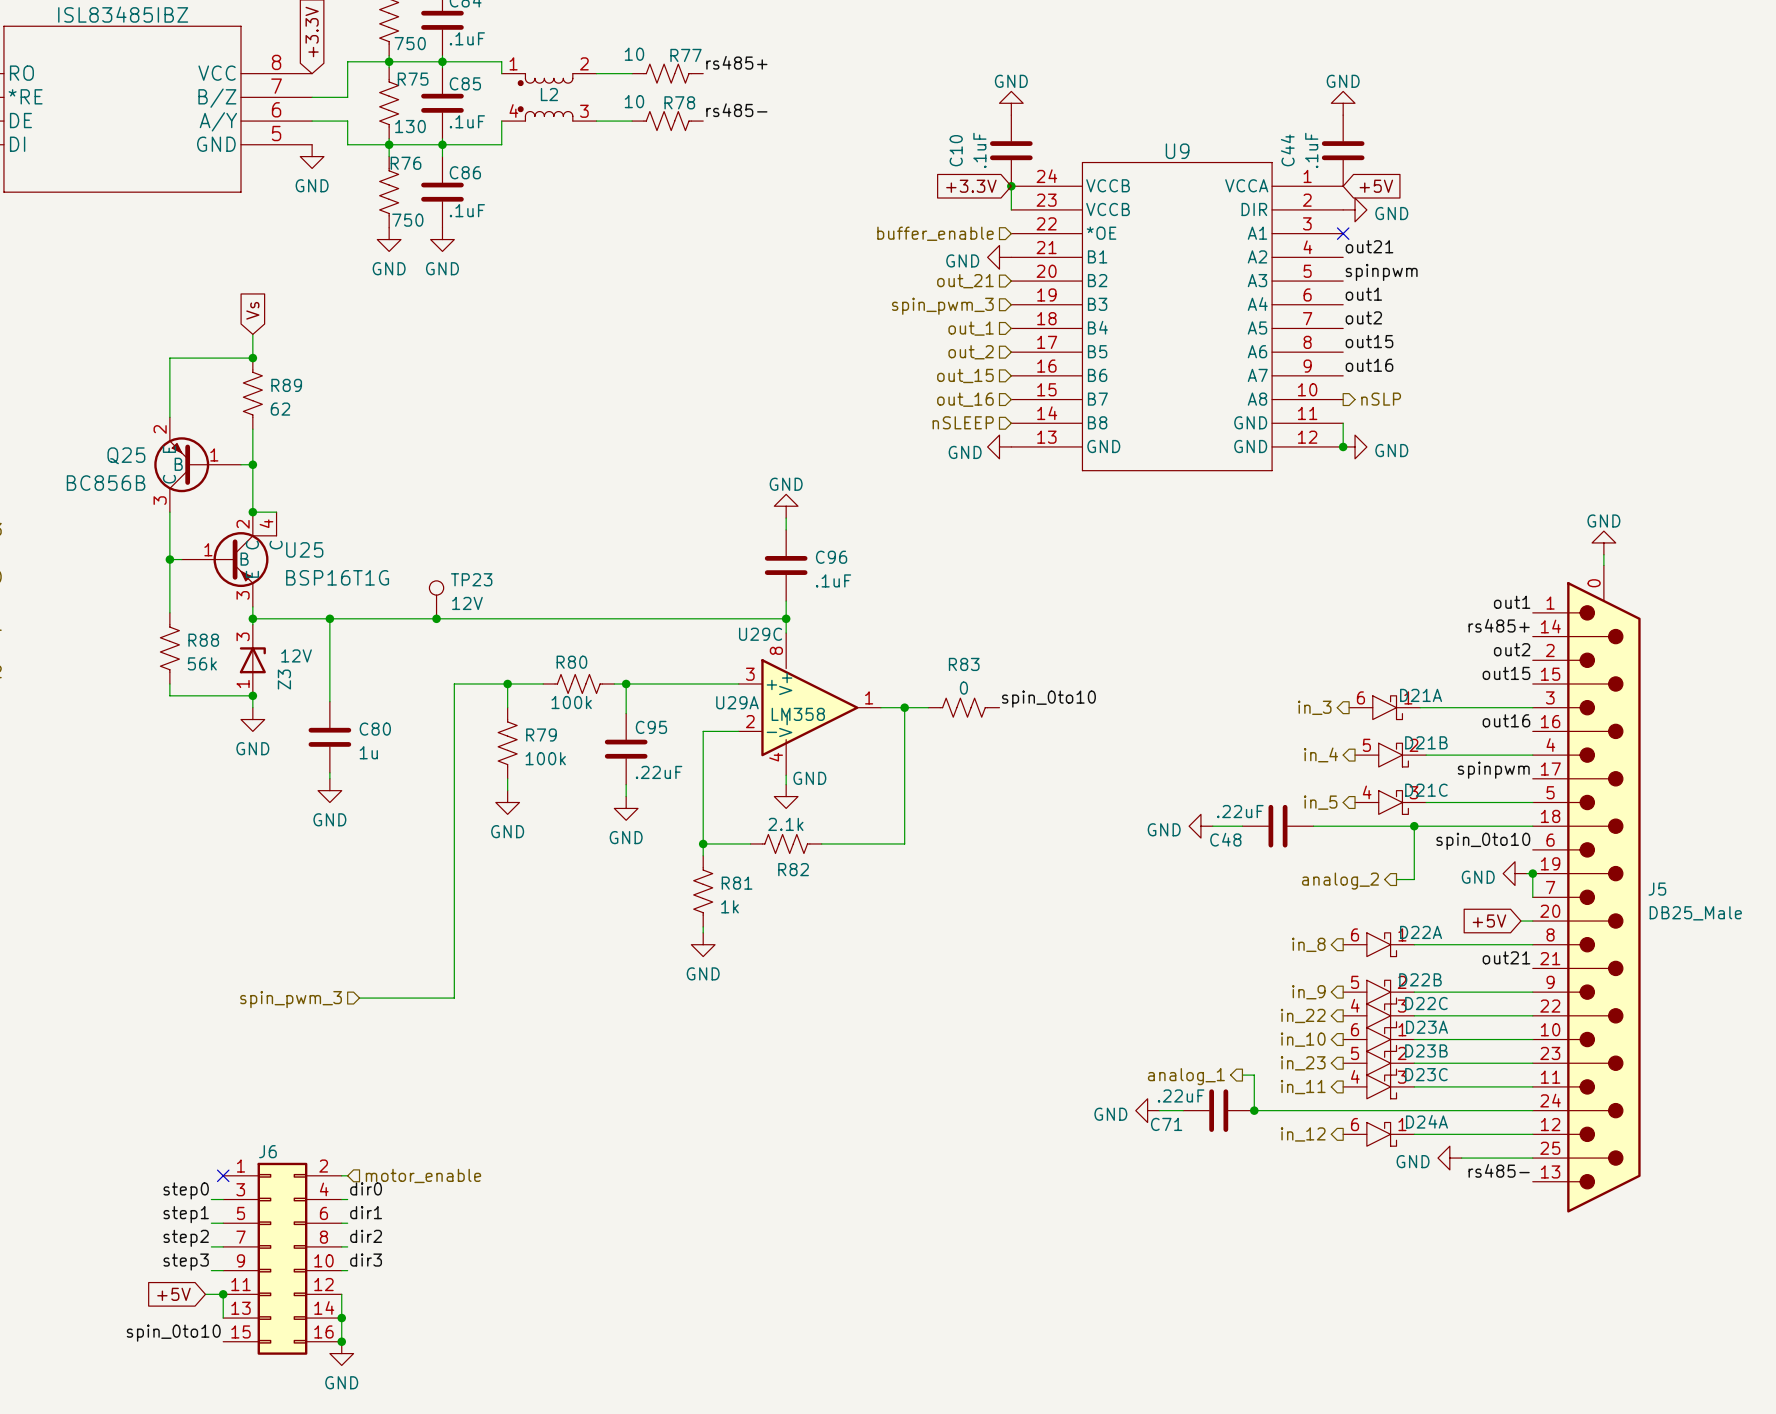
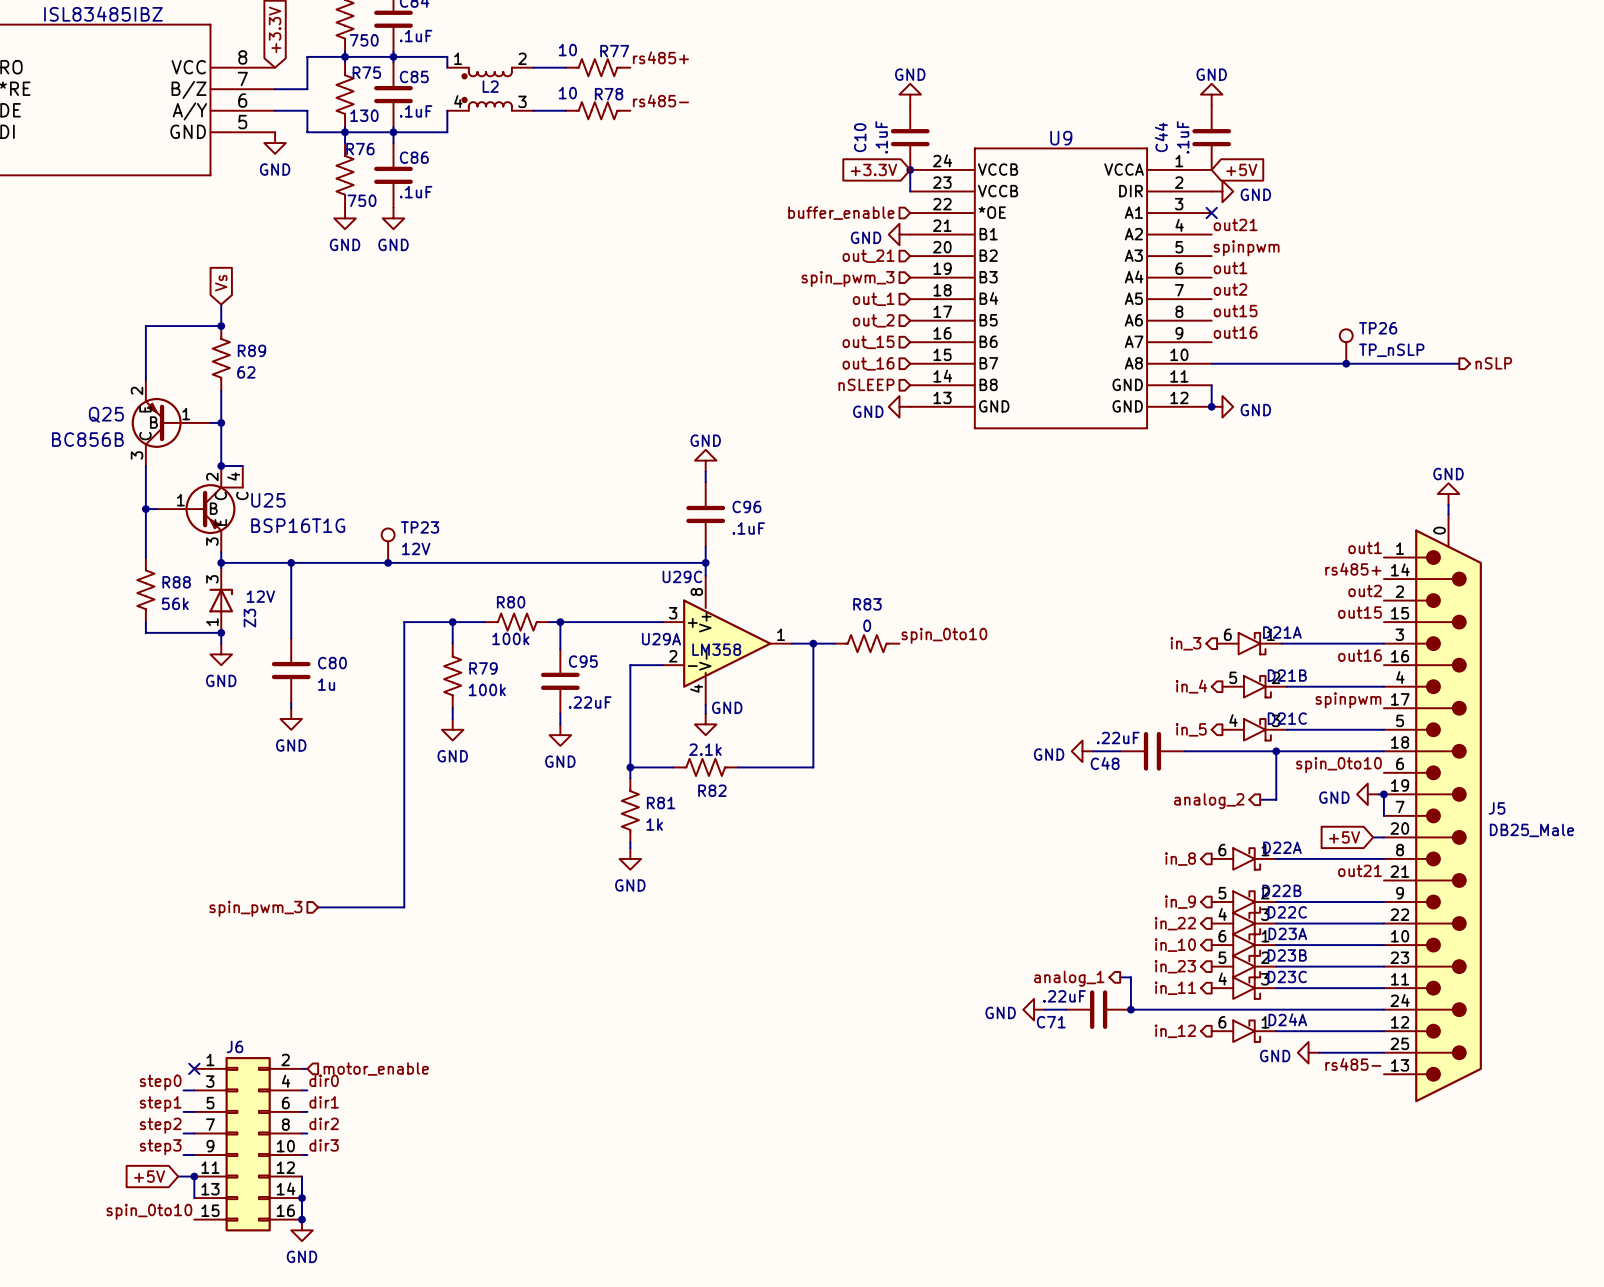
TP26: none -> TP_nSLP (1346, 346)
wire: none -> (1211, 363) (1459, 363)
hierarchical label: nSLP (1381, 399) -> none
junction: none -> (1346, 363)
hierarchical label: none -> nSLP (1493, 363)

